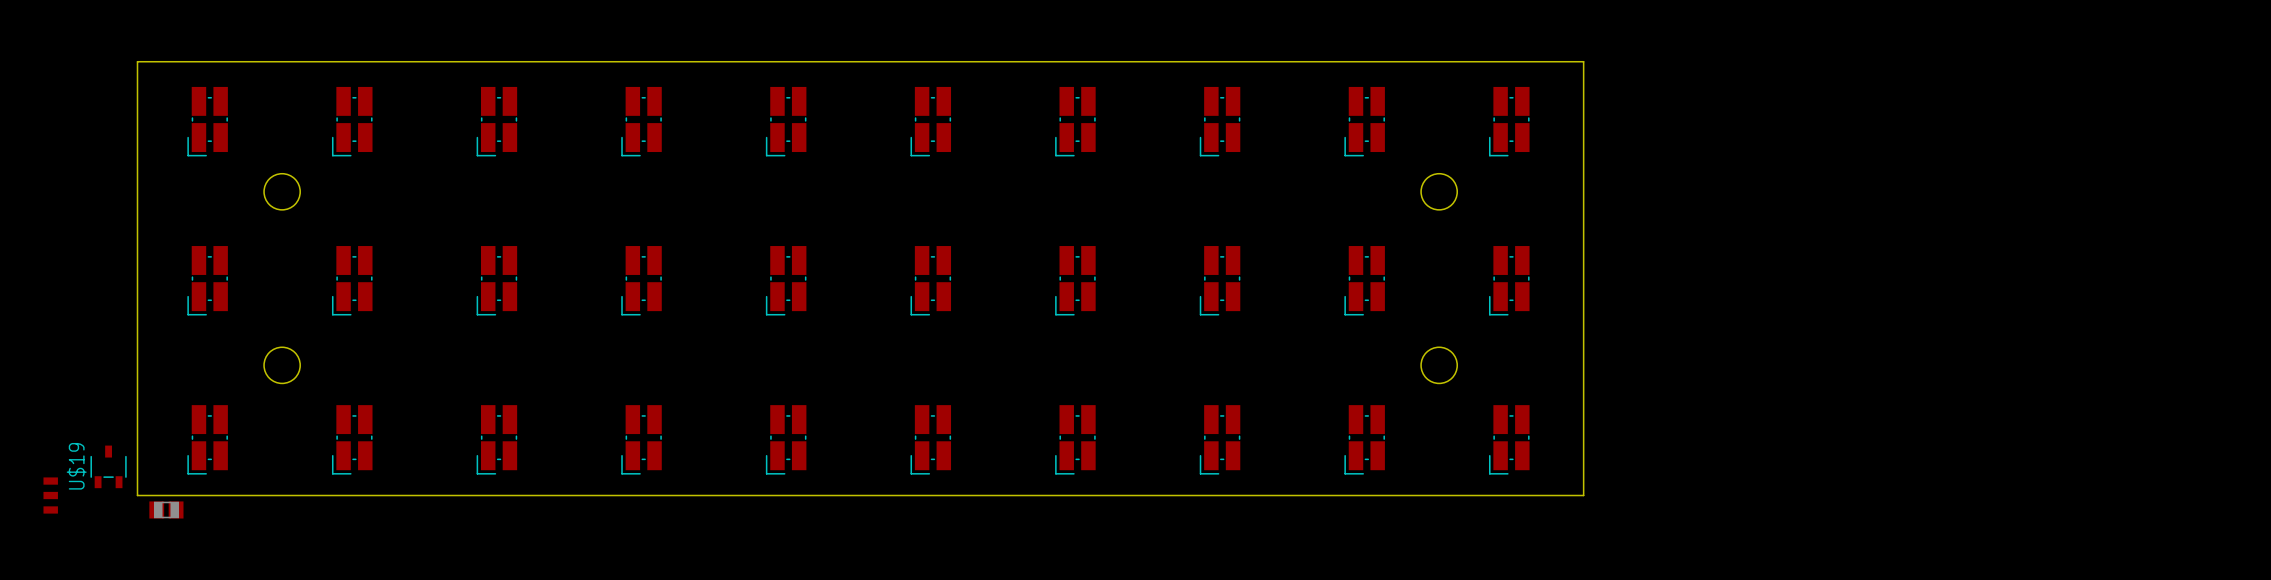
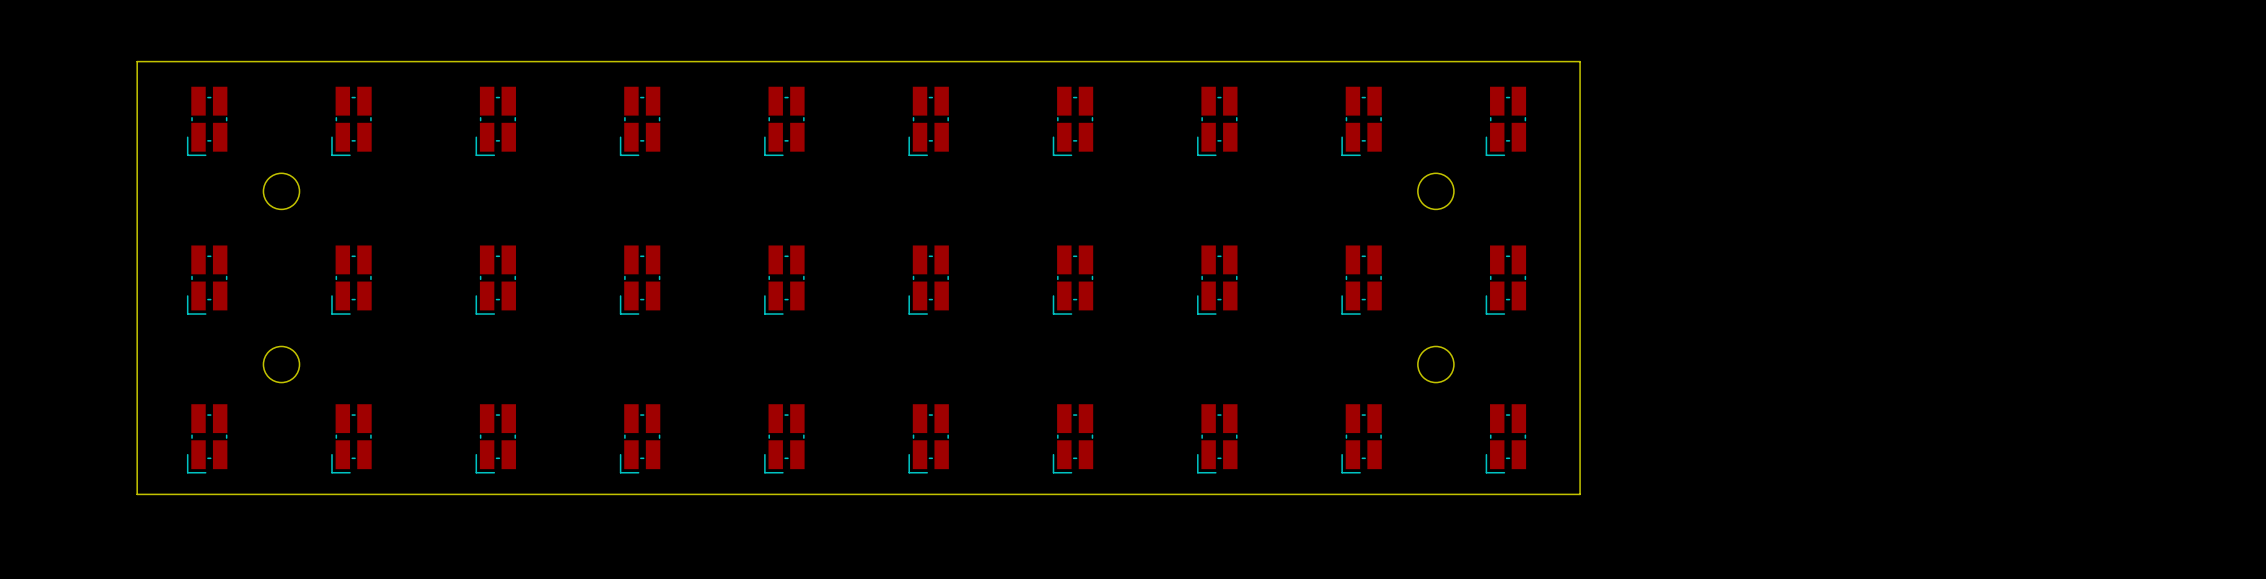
U$19: (108, 466) -> none
part: (50, 495) -> none
part: (166, 509) -> none

